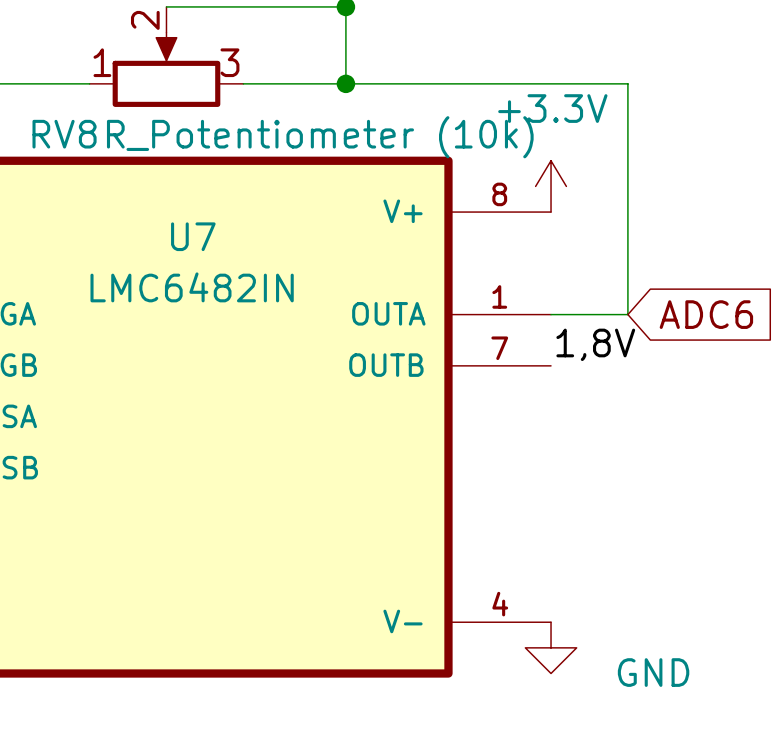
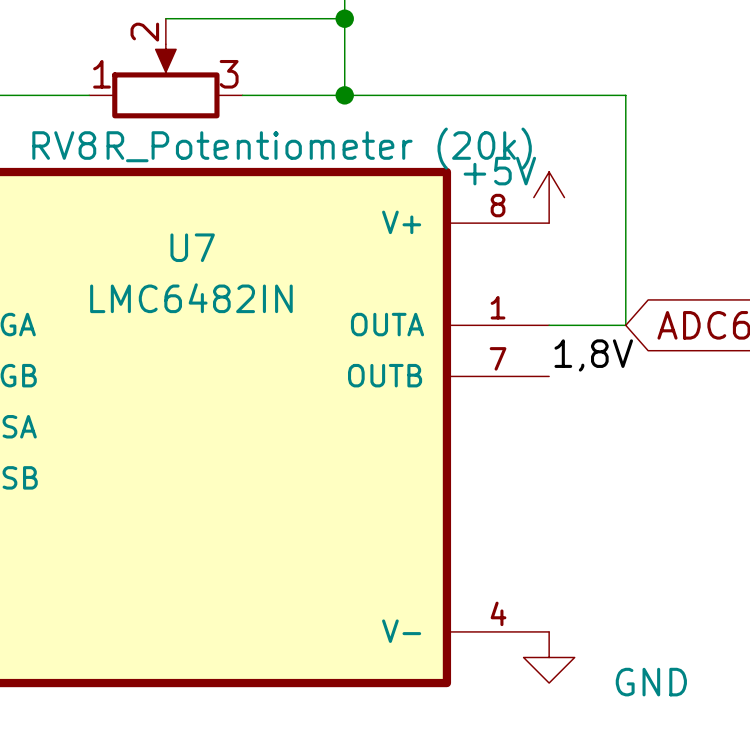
RV8 value: R_Potentiometer (10k) (320, 137) -> R_Potentiometer (20k) (319, 148)
power symbol: +3.3V (551, 186) -> +5V (549, 197)

